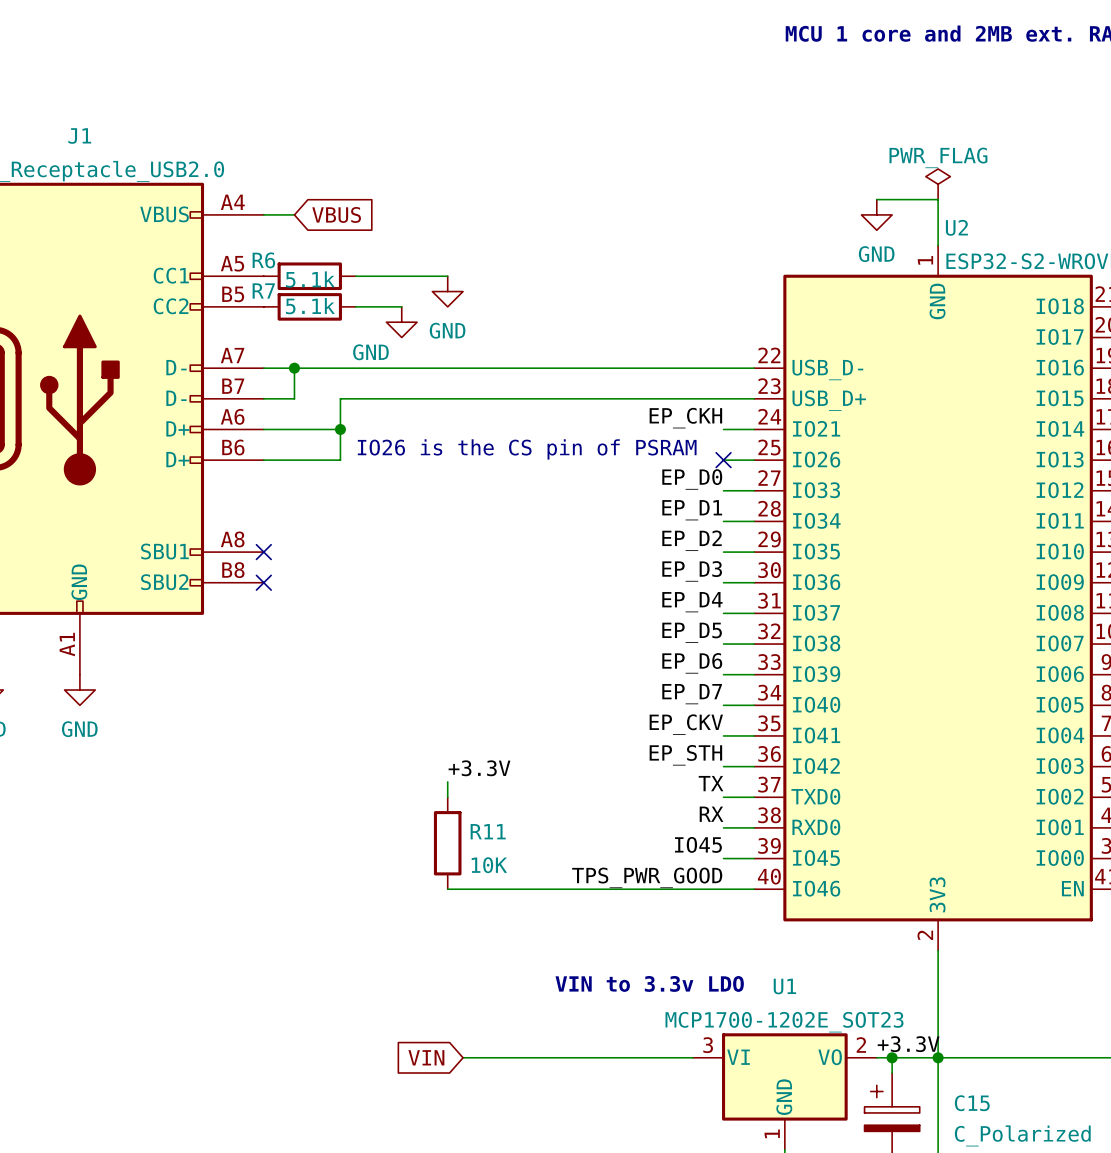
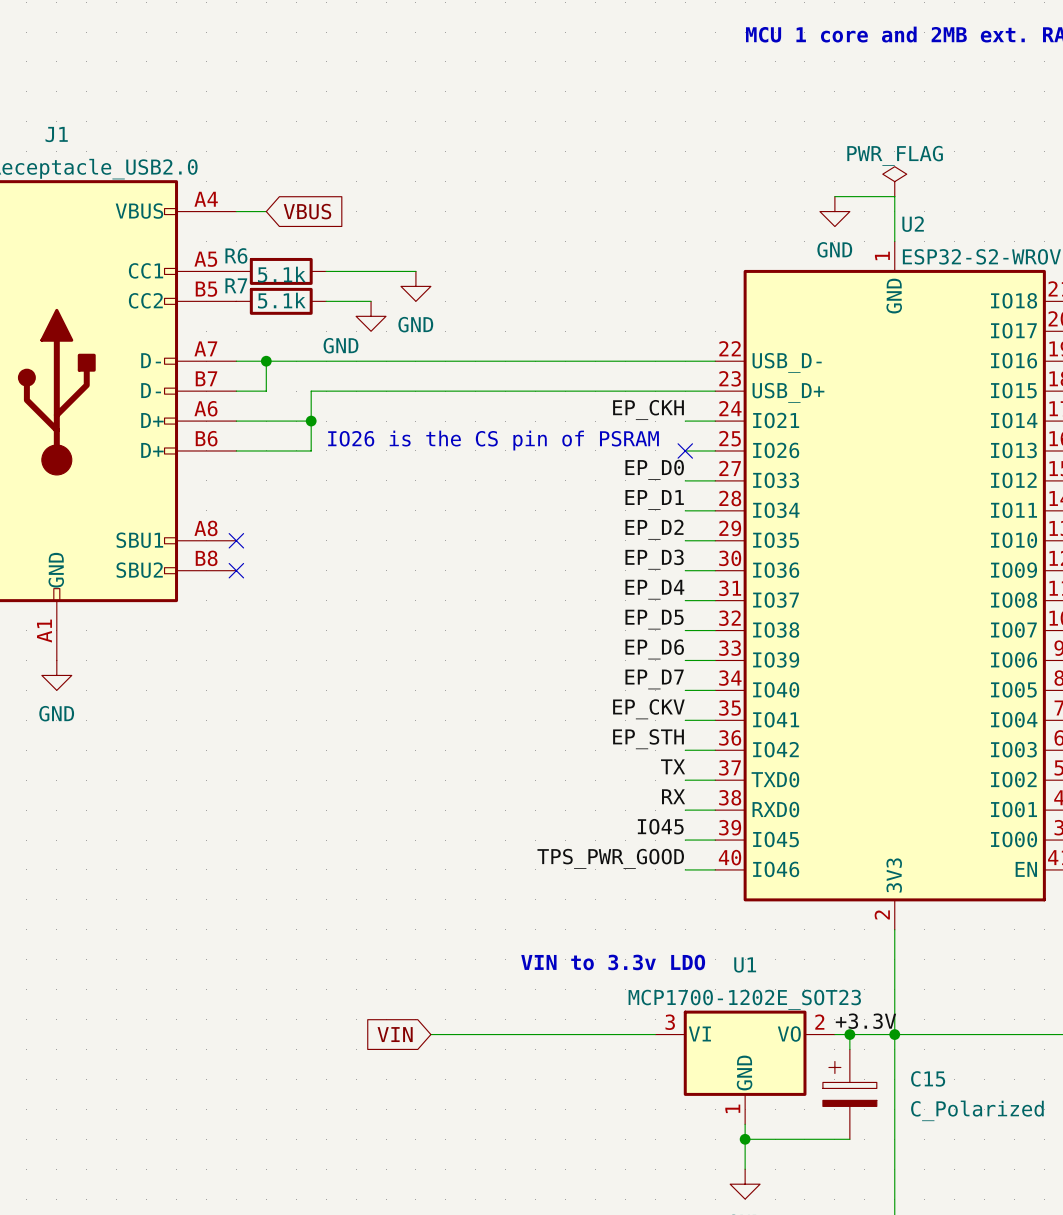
label: +3.3V (479, 768) -> none
wire: (447, 781) (447, 797) -> none
R11: 10K (447, 843) -> none
wire: (447, 889) (723, 889) -> none

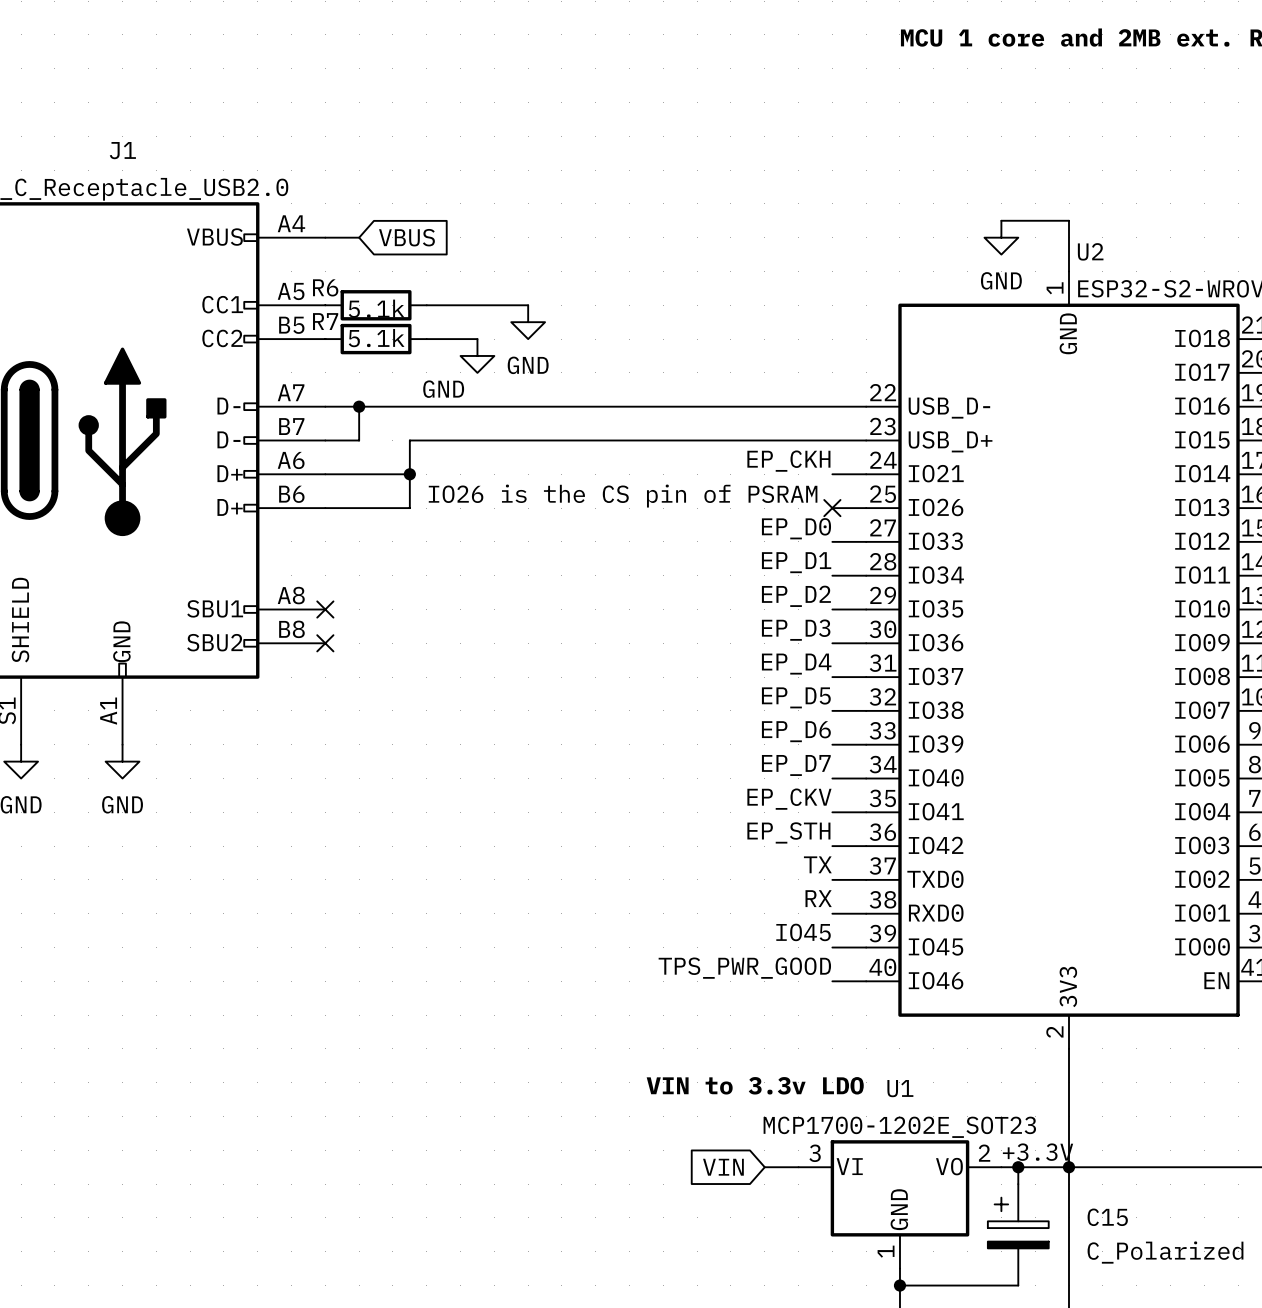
power symbol: PWR_FLAG (894, 181) -> none
global label position: VIN (395, 1034) -> VIN (723, 1167)
wire: (430, 1034) (625, 1034) -> none

